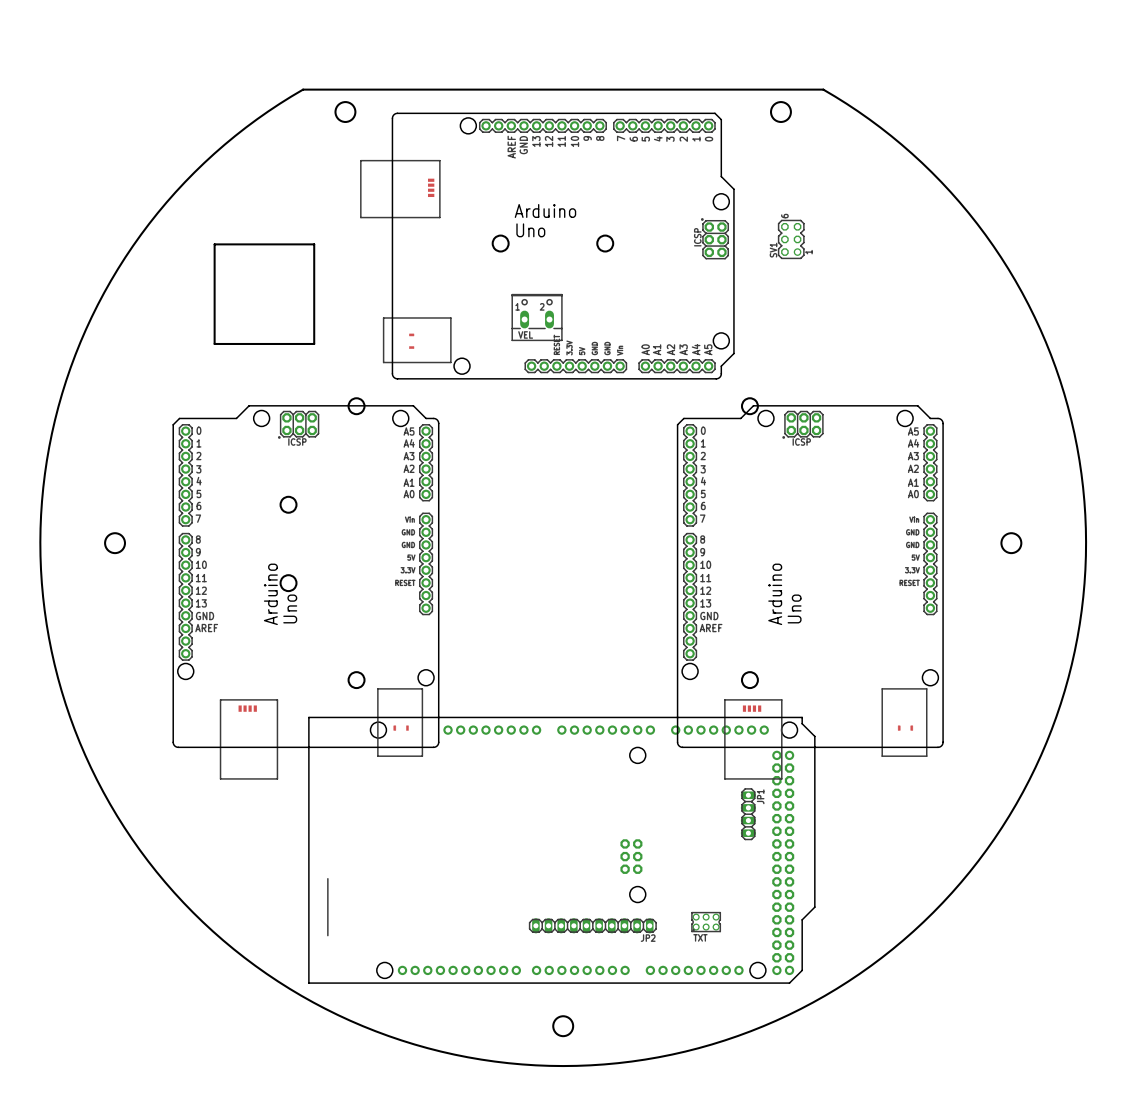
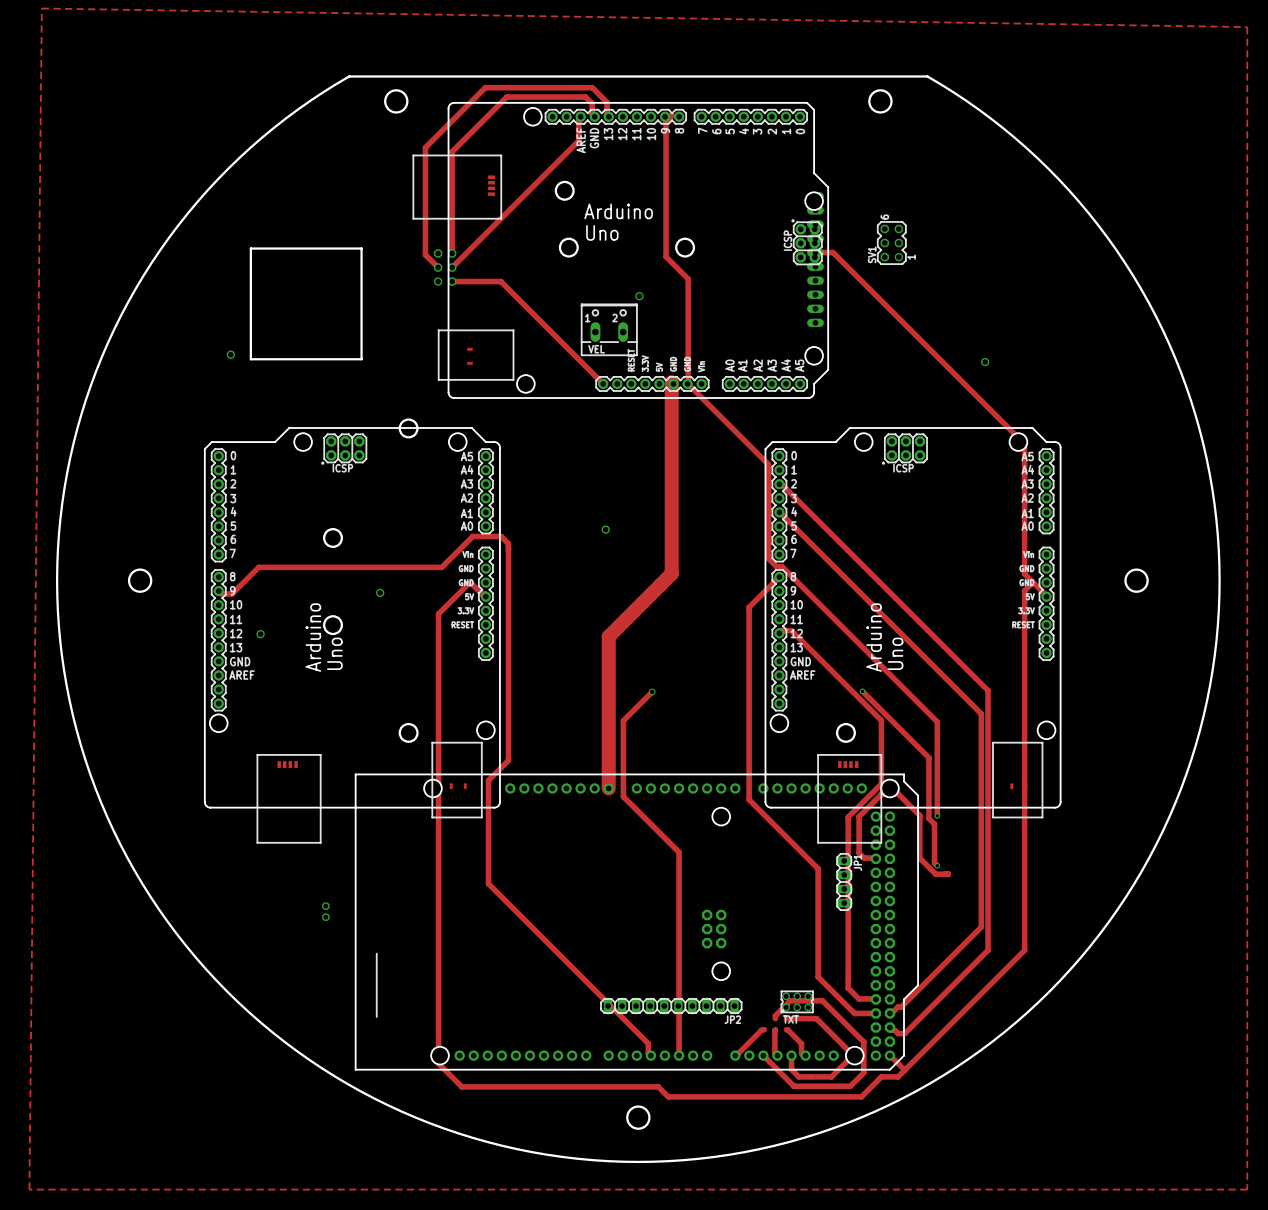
zone outline: none -> (41, 8) (1247, 27) (1247, 1189) (29, 1189) (41, 8)
track: none -> (578, 114) (578, 140) (452, 267)
track: none -> (592, 114) (592, 103) (585, 97) (506, 97) (452, 151) (452, 253)
track: none -> (607, 114) (607, 102) (592, 87) (485, 87) (425, 147) (425, 254) (438, 267)
track: none -> (671, 114) (666, 121) (666, 256) (688, 278) (688, 384) (768, 464) (768, 558) (776, 566) (782, 566) (937, 721) (937, 815)
round board edge: none -> [554, 180, 575, 201]
track: none -> (815, 252) (833, 252) (1024, 444) (1024, 574) (1046, 596)
part: none -> (815, 259)
part: none -> (445, 267)
track: none -> (452, 281) (500, 281) (601, 382)
via: none -> (639, 296)
via: none -> (230, 354)
via: none -> (985, 362)
track: none -> (671, 382) (671, 573) (608, 636) (608, 788)
round board edge: [740, 397, 759, 416] -> none
track: none -> (779, 484) (781, 484) (988, 690) (988, 950) (904, 1033) (898, 1033) (889, 1027)
track: none -> (779, 512) (981, 713) (981, 927) (901, 1006) (898, 1006) (889, 1013)
via: none -> (605, 529)
track: none -> (508, 544) (508, 760) (488, 780) (488, 883) (648, 1043) (648, 1053) (650, 1055)
track: none -> (508, 549) (508, 543) (501, 536) (472, 536) (441, 567) (258, 567) (232, 593) (222, 593) (218, 591)
track: none -> (779, 577) (749, 607) (749, 799) (818, 868) (818, 977) (854, 1013) (875, 1013)
track: none -> (1032, 582) (1024, 590) (1024, 950) (898, 1076) (881, 1076) (861, 1096) (668, 1096) (658, 1086) (461, 1086) (438, 1063) (438, 613) (468, 584) (471, 584) (481, 593) (485, 593) (485, 596)
via: none -> (380, 592)
track: none -> (779, 633) (781, 630) (791, 630) (881, 720) (881, 783) (848, 817) (848, 988) (859, 998) (875, 999)
via: none -> (260, 634)
track: none -> (862, 691) (928, 757) (928, 818) (934, 824) (934, 862) (937, 865)
via: none -> (862, 691)
track: none -> (652, 691) (623, 720) (623, 796) (679, 852) (679, 1055)
via: none -> (652, 691)
via: none -> (937, 815)
track: none -> (875, 858) (864, 858) (859, 853) (859, 816) (881, 793) (898, 793) (919, 815) (919, 858) (935, 874) (948, 874) (944, 873)
via: none -> (937, 865)
part: none -> (325, 911)
track: none -> (775, 1018) (775, 1015) (790, 1000) (822, 1000) (863, 1042) (863, 1072) (850, 1086) (794, 1086) (763, 1055)
track: none -> (786, 1018) (816, 1018) (848, 1050) (848, 1060) (831, 1076) (798, 1076) (791, 1069) (791, 1053)
track: none -> (764, 1029) (735, 1055)
track: none -> (775, 1029) (774, 1053) (777, 1055)
track: none -> (786, 1029) (801, 1043) (801, 1053) (805, 1055)
track: none -> (891, 1056) (904, 1070)

